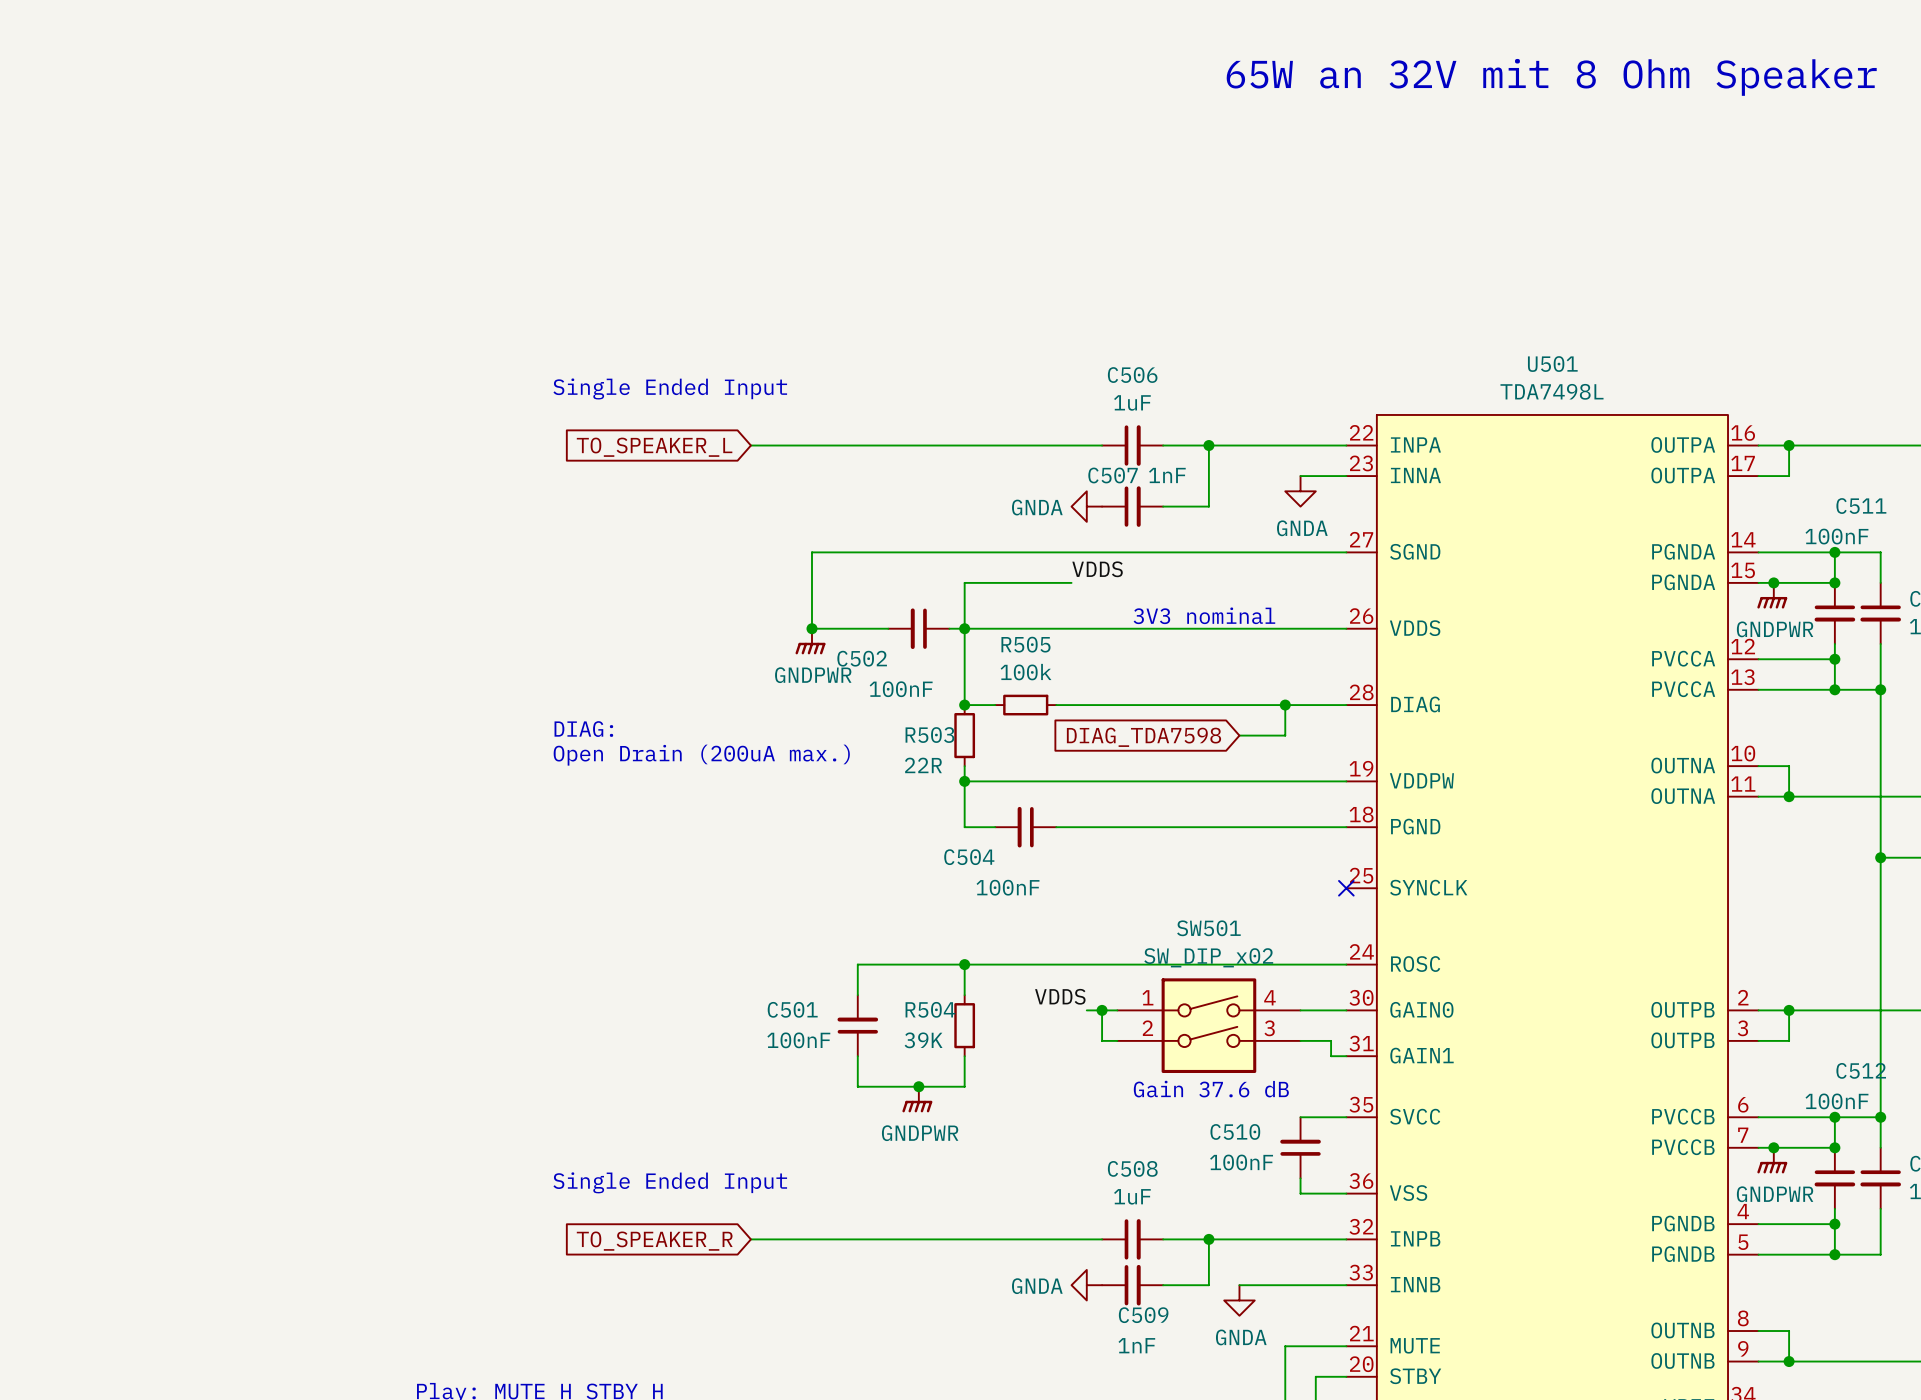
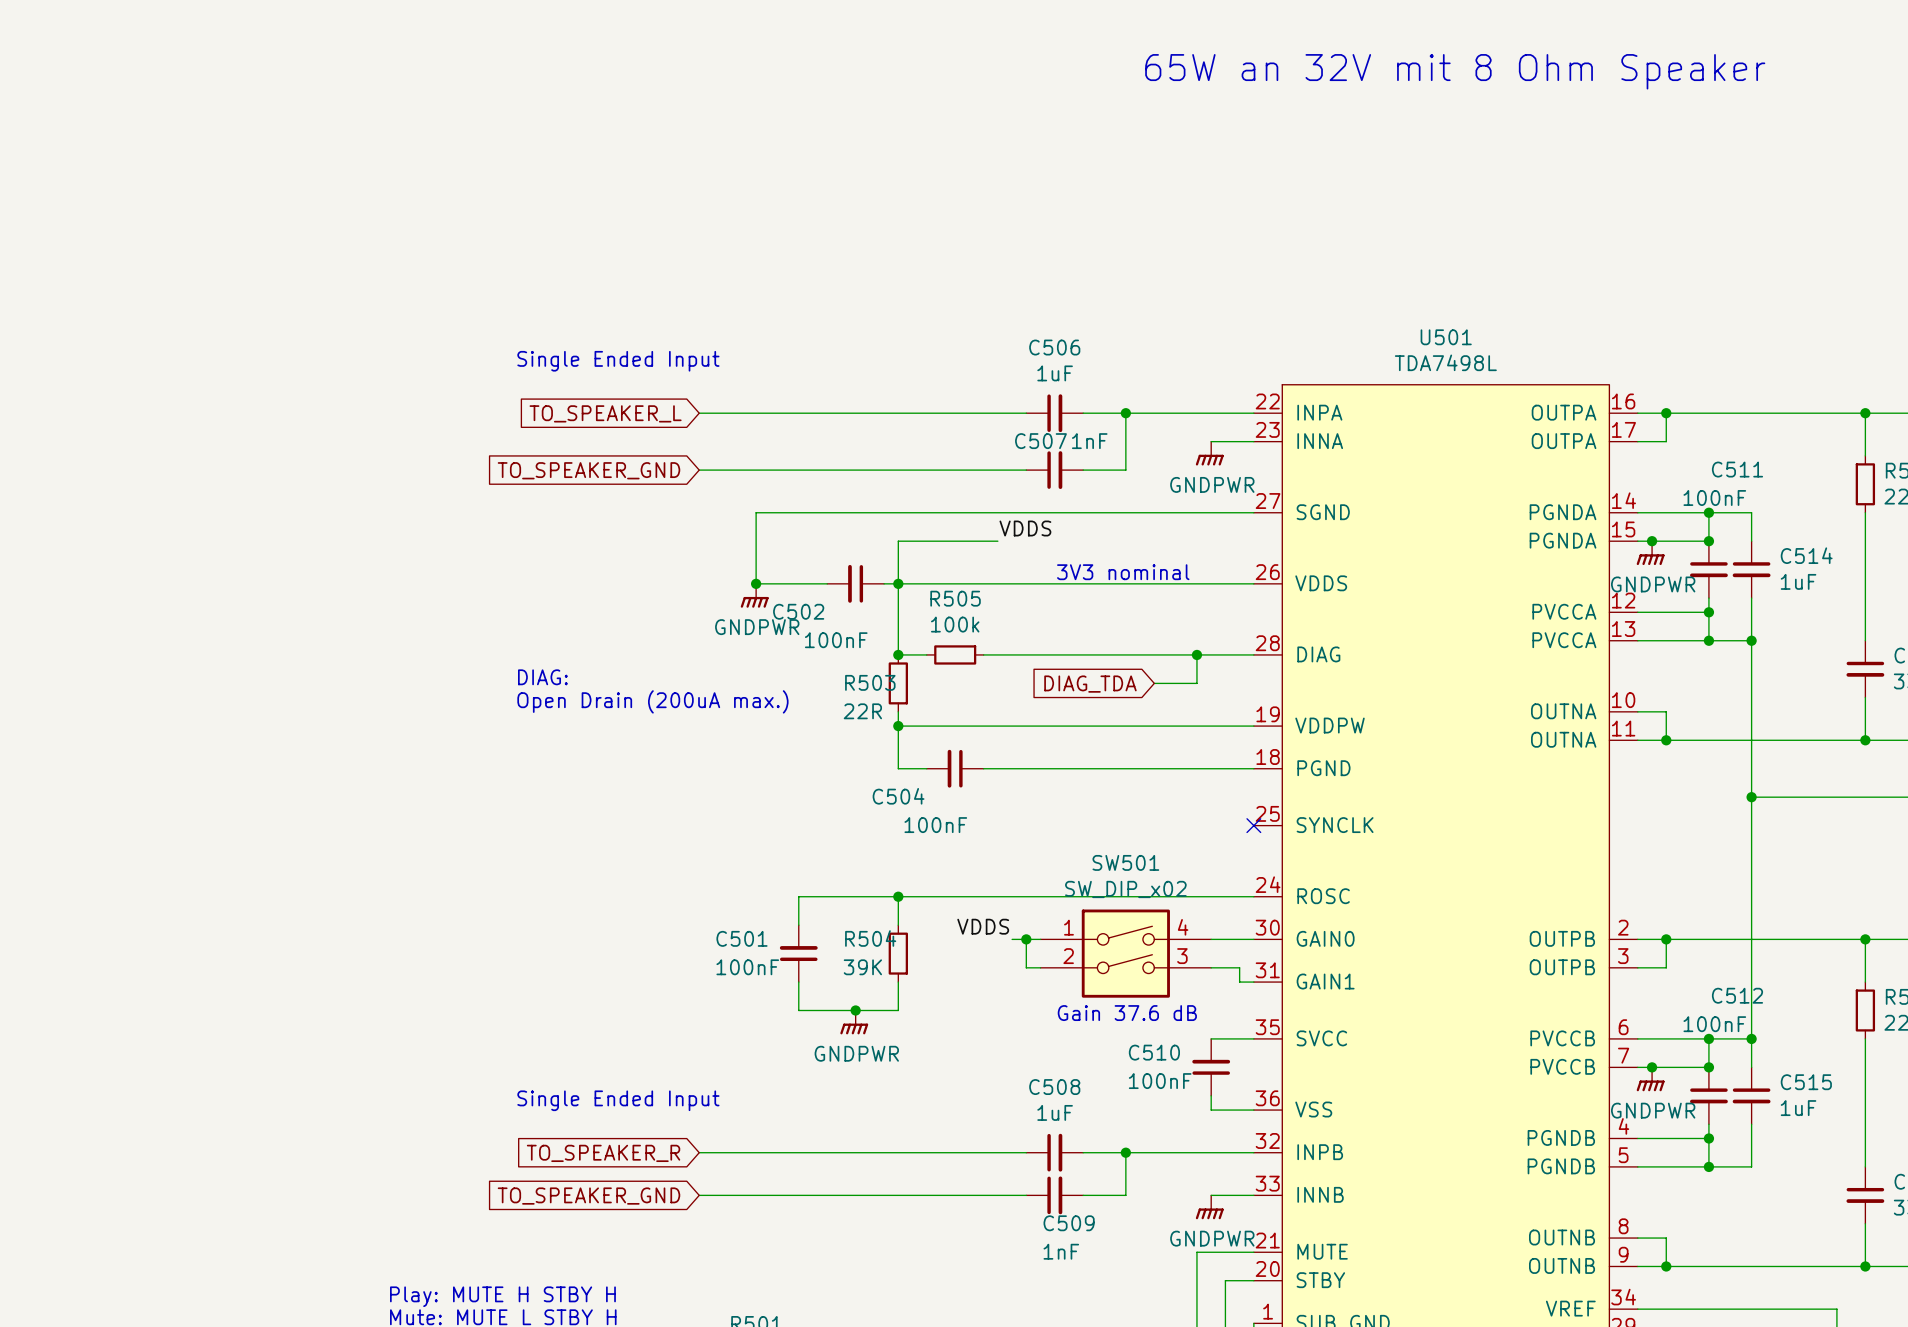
power symbol: GNDA (1300, 491) -> GNDPWR (1209, 453)
wire: none -> (699, 470) (1026, 470)
power symbol: GNDA (1086, 506) -> none
global label: none -> TO_SPEAKER_GND (588, 470)
global label: DIAG_TDA7598 (1143, 737) -> DIAG_TDA (1090, 684)
wire: none -> (699, 1195) (1026, 1195)
power symbol: GNDA (1086, 1285) -> none
wire: (1239, 1285) (1300, 1285) -> none
global label: none -> TO_SPEAKER_GND (588, 1196)
power symbol: none -> GNDPWR (1209, 1207)
power symbol: GNDA (1239, 1300) -> none

